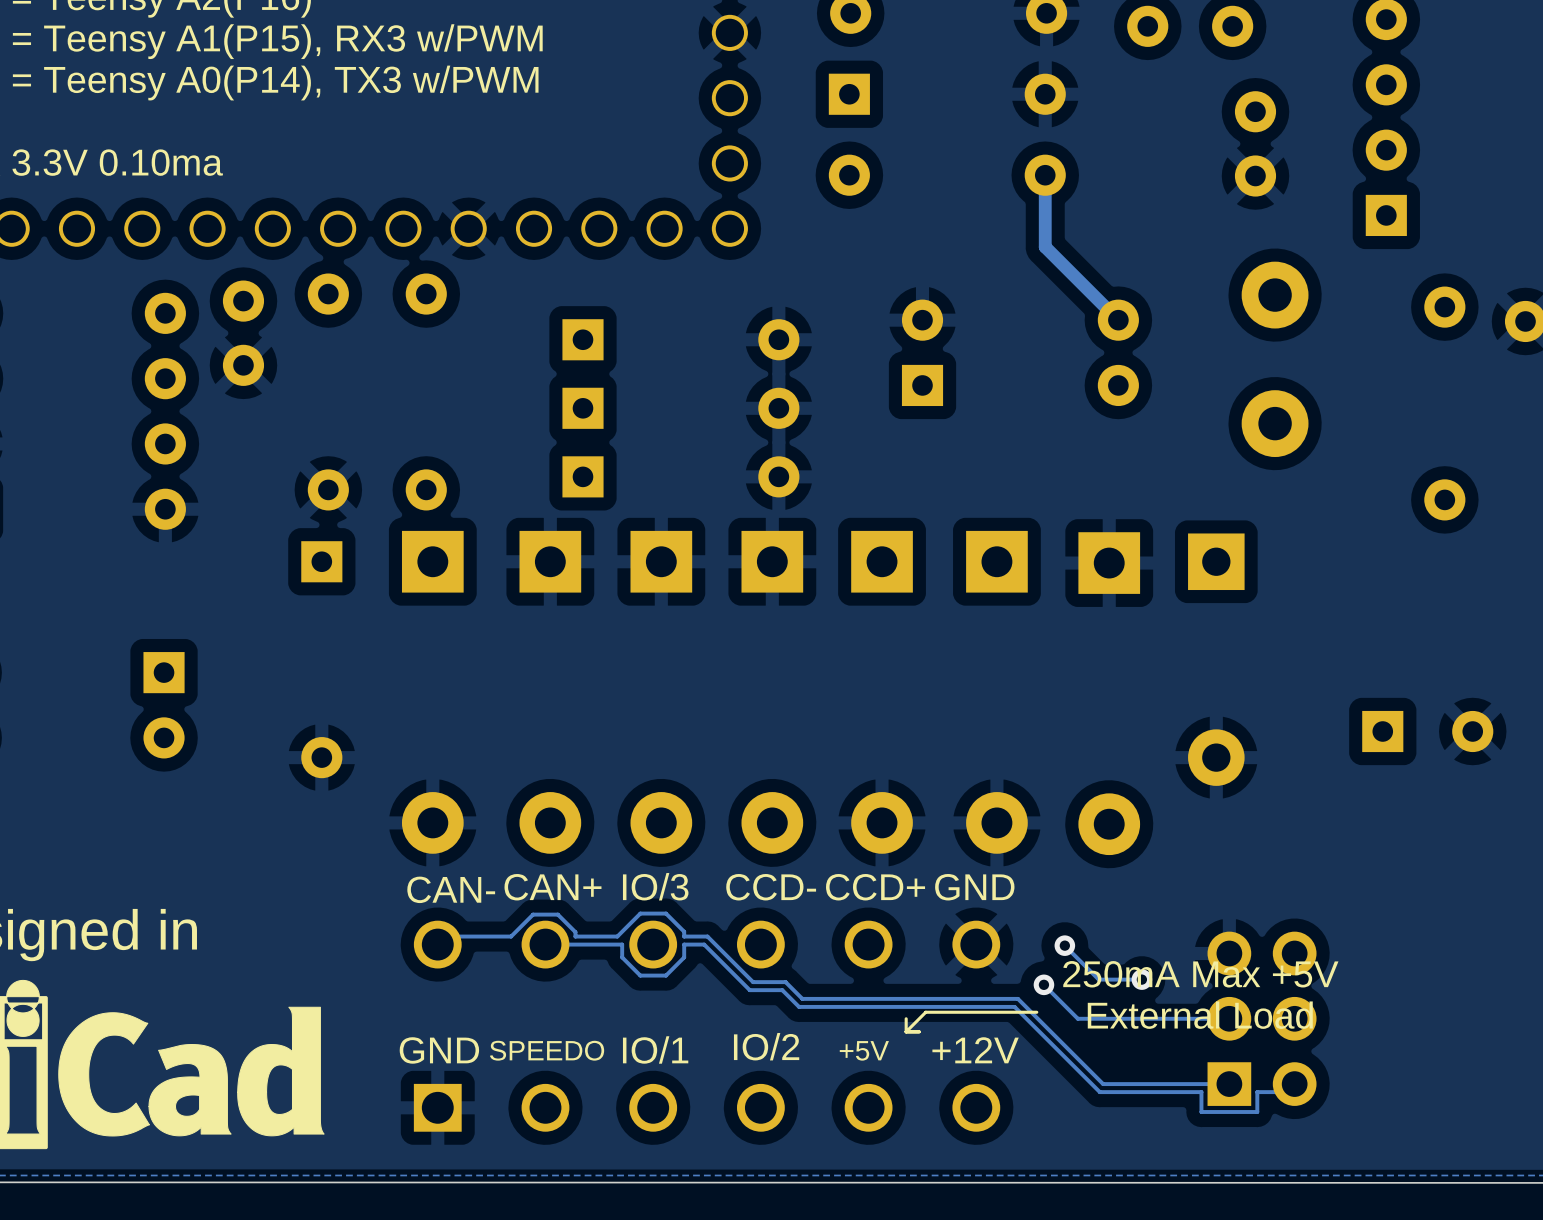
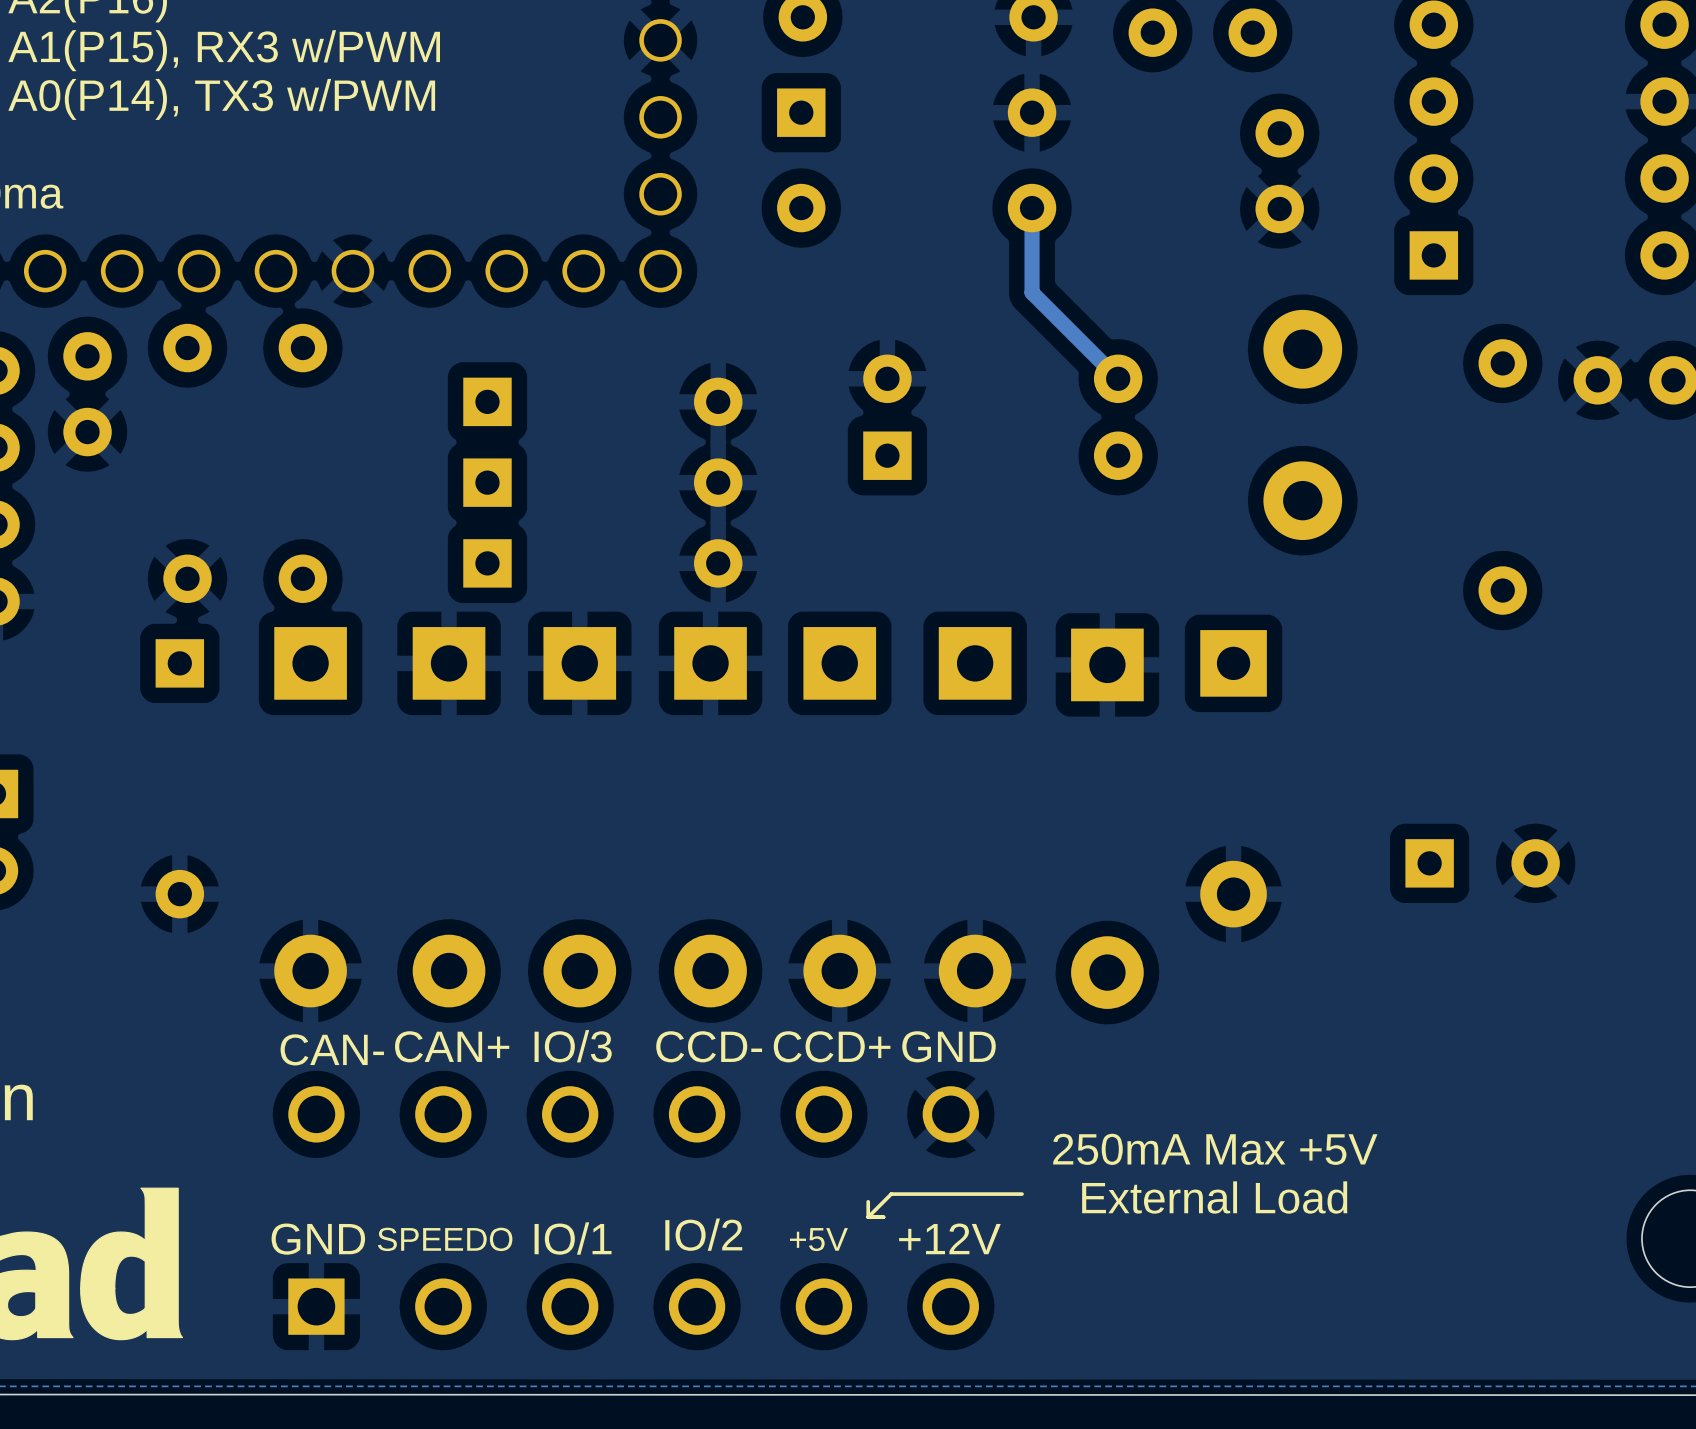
track: (437, 944) (445, 936) (511, 936) (533, 914) (557, 914) (575, 932) (575, 936) (617, 936) (640, 913) (666, 913) (684, 931) (684, 936) (707, 936) (753, 982) (785, 982) (802, 998) (1017, 998) (1103, 1084) (1229, 1084) -> none
track: (545, 944) (622, 944) (622, 957) (640, 975) (666, 975) (684, 957) (684, 944) (704, 944) (749, 990) (782, 990) (799, 1006) (1014, 1006) (1099, 1092) (1201, 1092) (1201, 1112) (1257, 1112) (1257, 1092) (1286, 1092) (1294, 1084) -> none
track: (1064, 945) (1098, 979) (1141, 979) -> none
via: (1064, 945) -> none
via: (1141, 979) -> none
track: (1043, 984) (1077, 1018) (1229, 1018) -> none
via: (1043, 984) -> none
part: (1262, 1018) -> none

